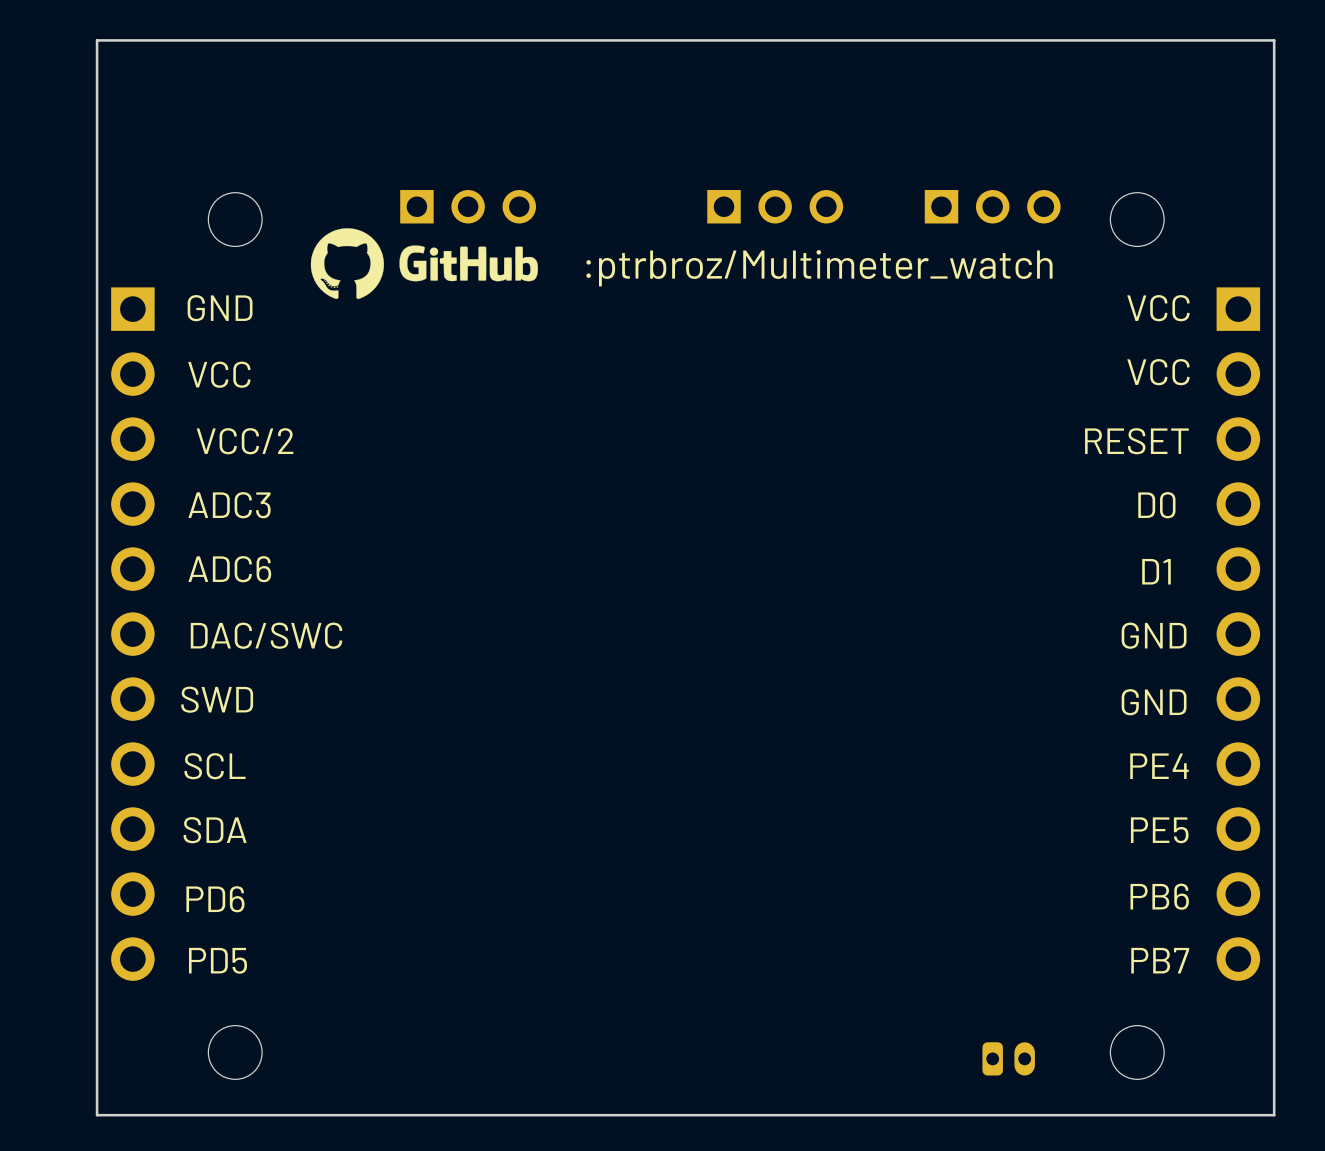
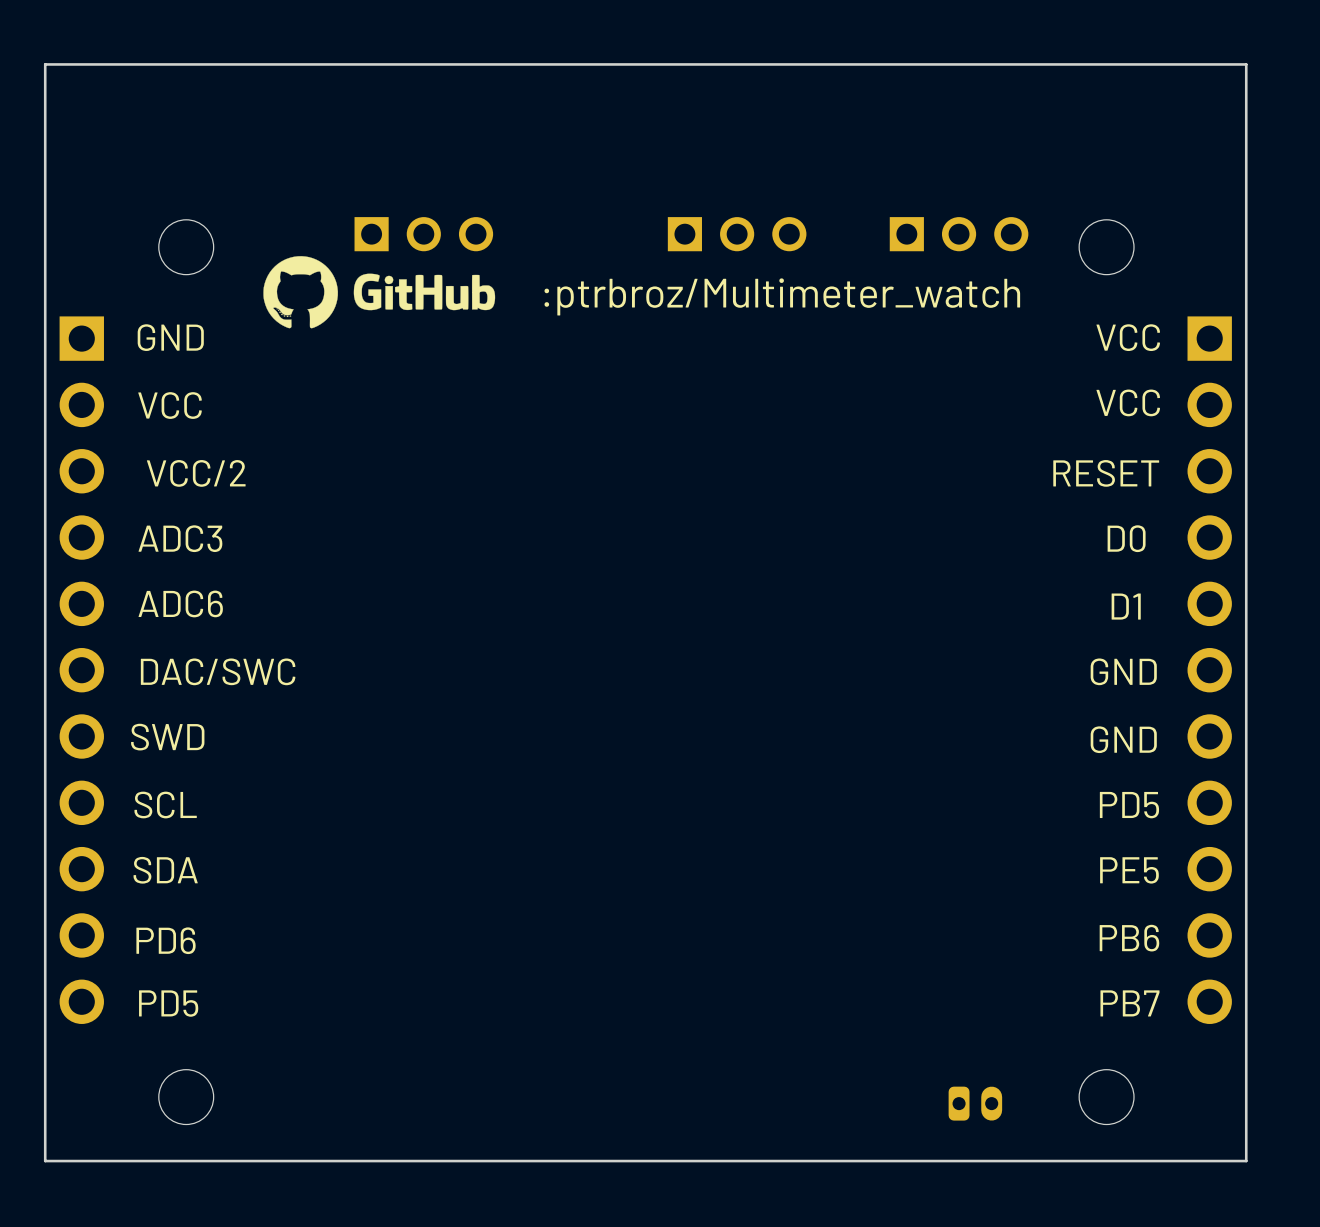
text: PE4 (1159, 766) -> PD5 (1129, 805)

